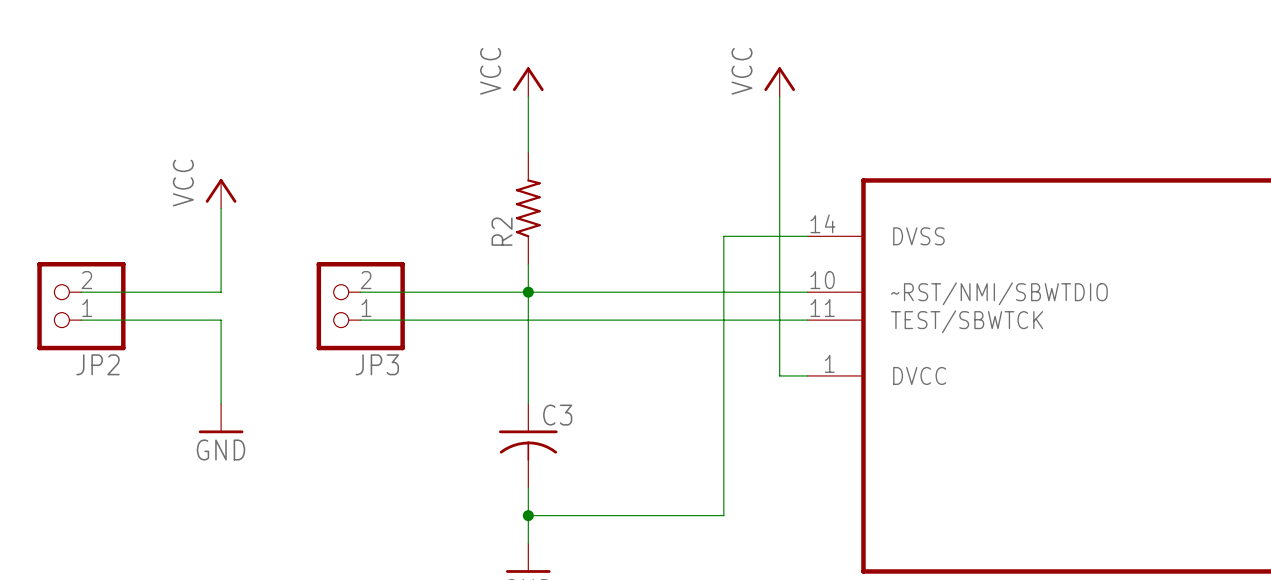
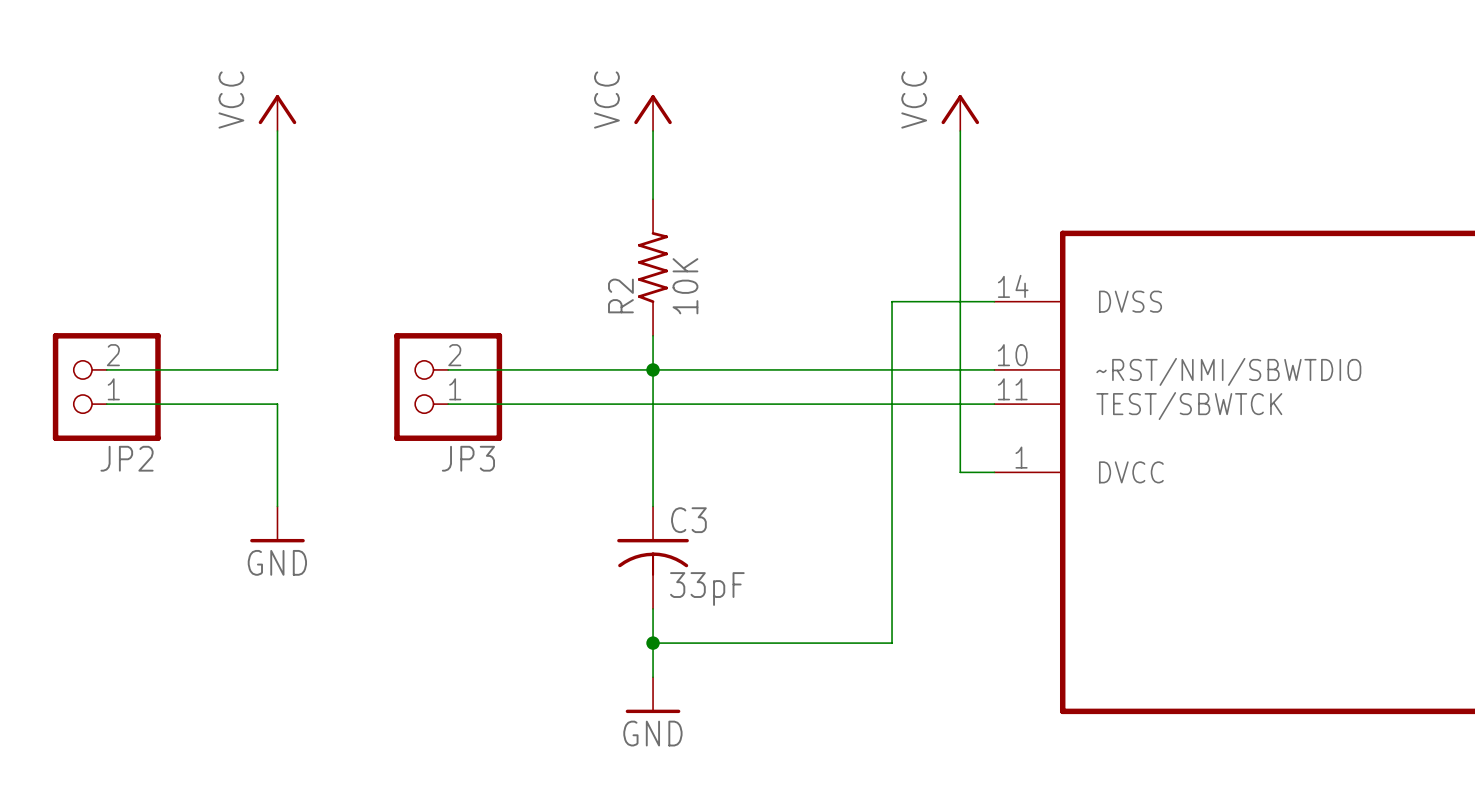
wire: none -> (277, 130) (277, 267)
power symbol position: VCC (221, 193) -> VCC (277, 113)
R2 value: none -> 10K (685, 286)
C3 value: none -> 33pF (707, 589)

